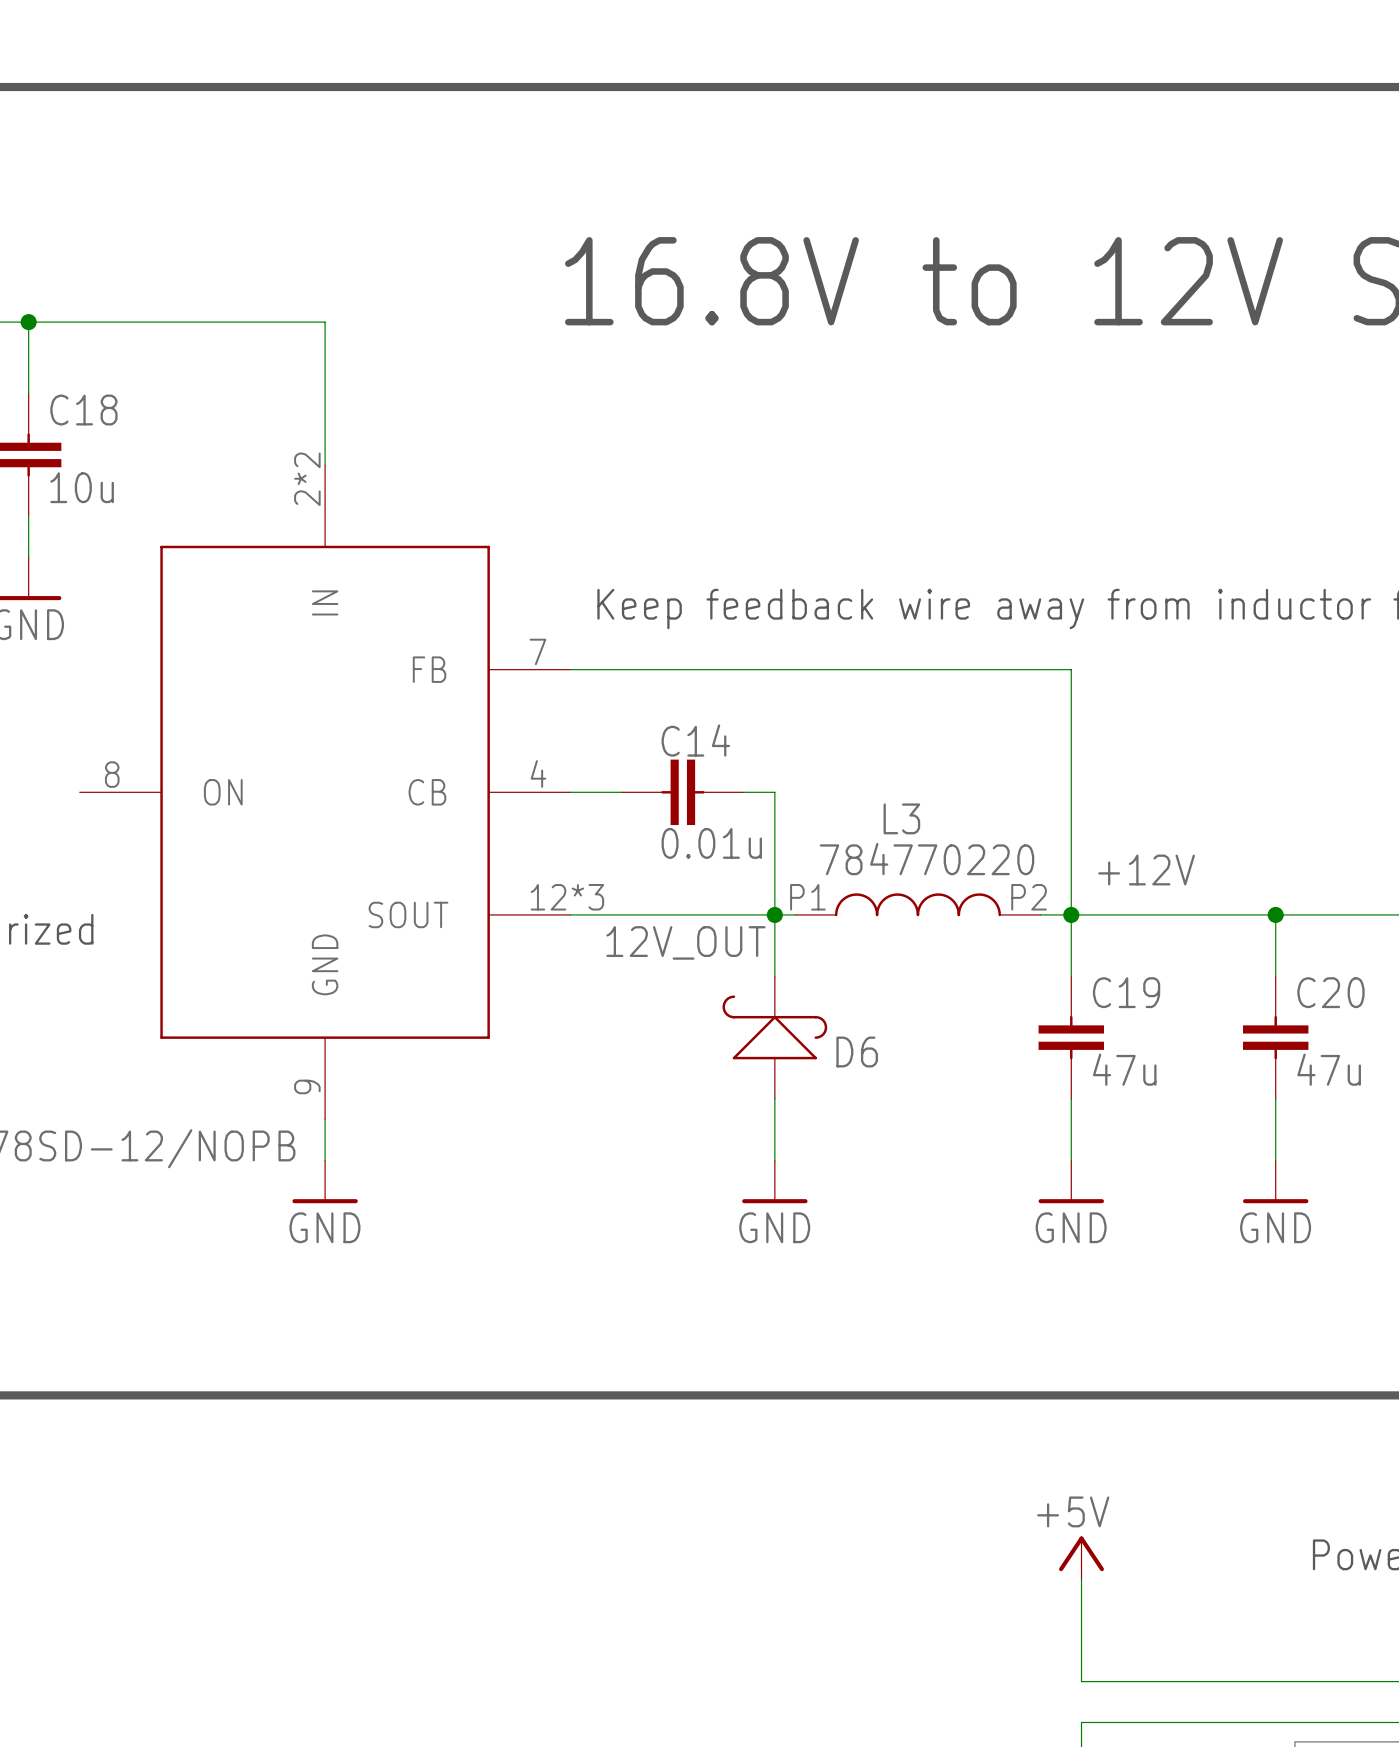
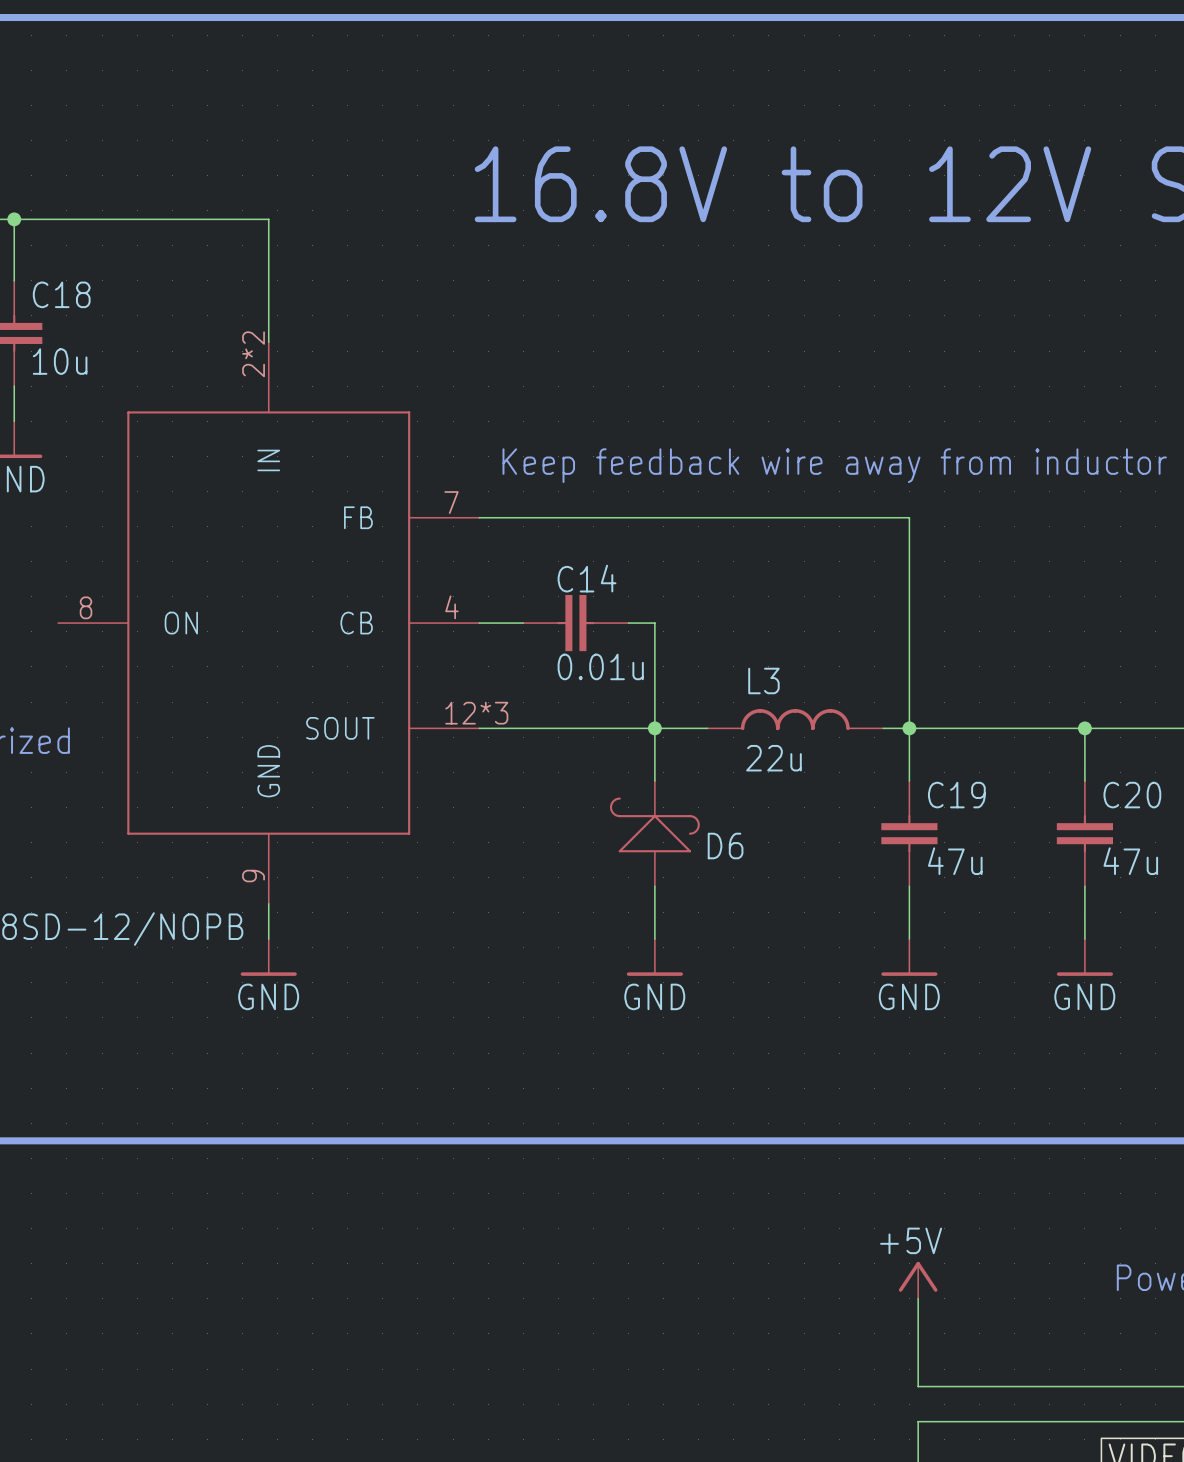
L3 name position: L3 (901, 818) -> L3 (763, 680)
L3 value: 784770220 (927, 859) -> 22u (773, 758)
label: +12V (1146, 869) -> none
L3 symbol: [795, 893, 1041, 917] -> [707, 709, 884, 731]
label: 12V_OUT (686, 942) -> none

